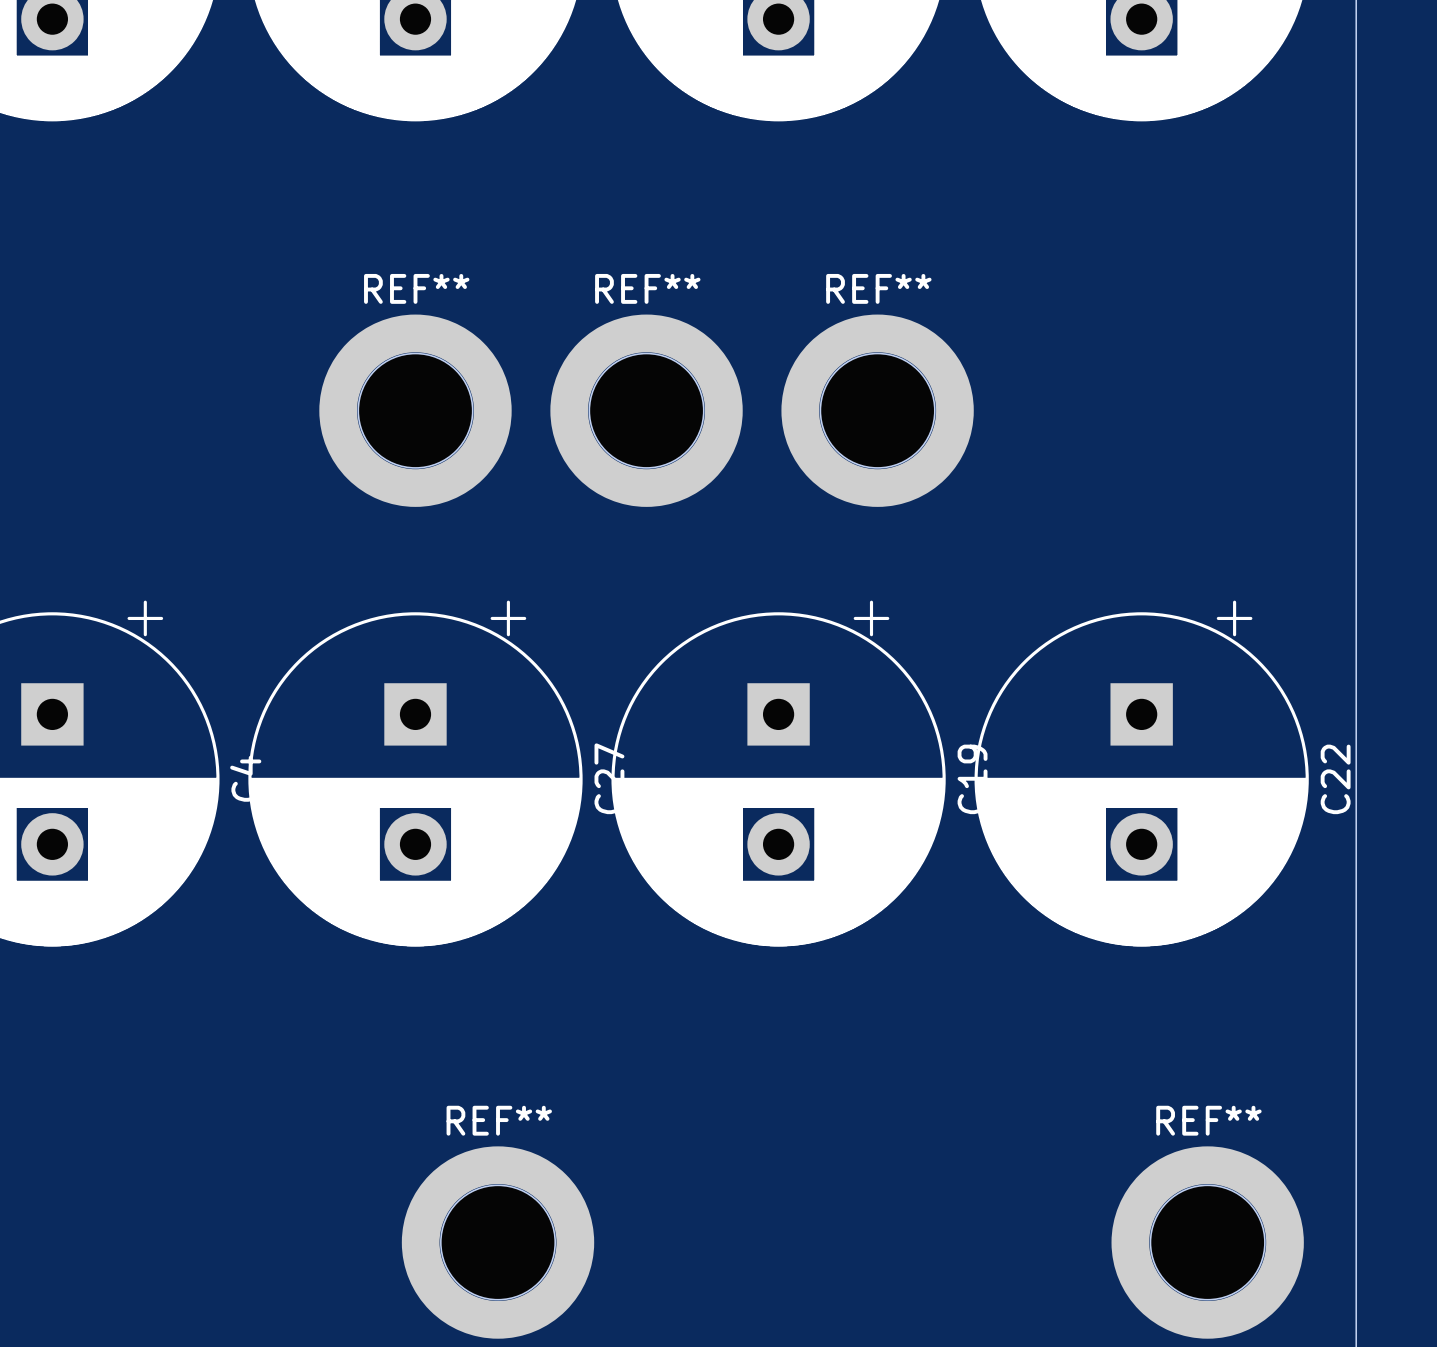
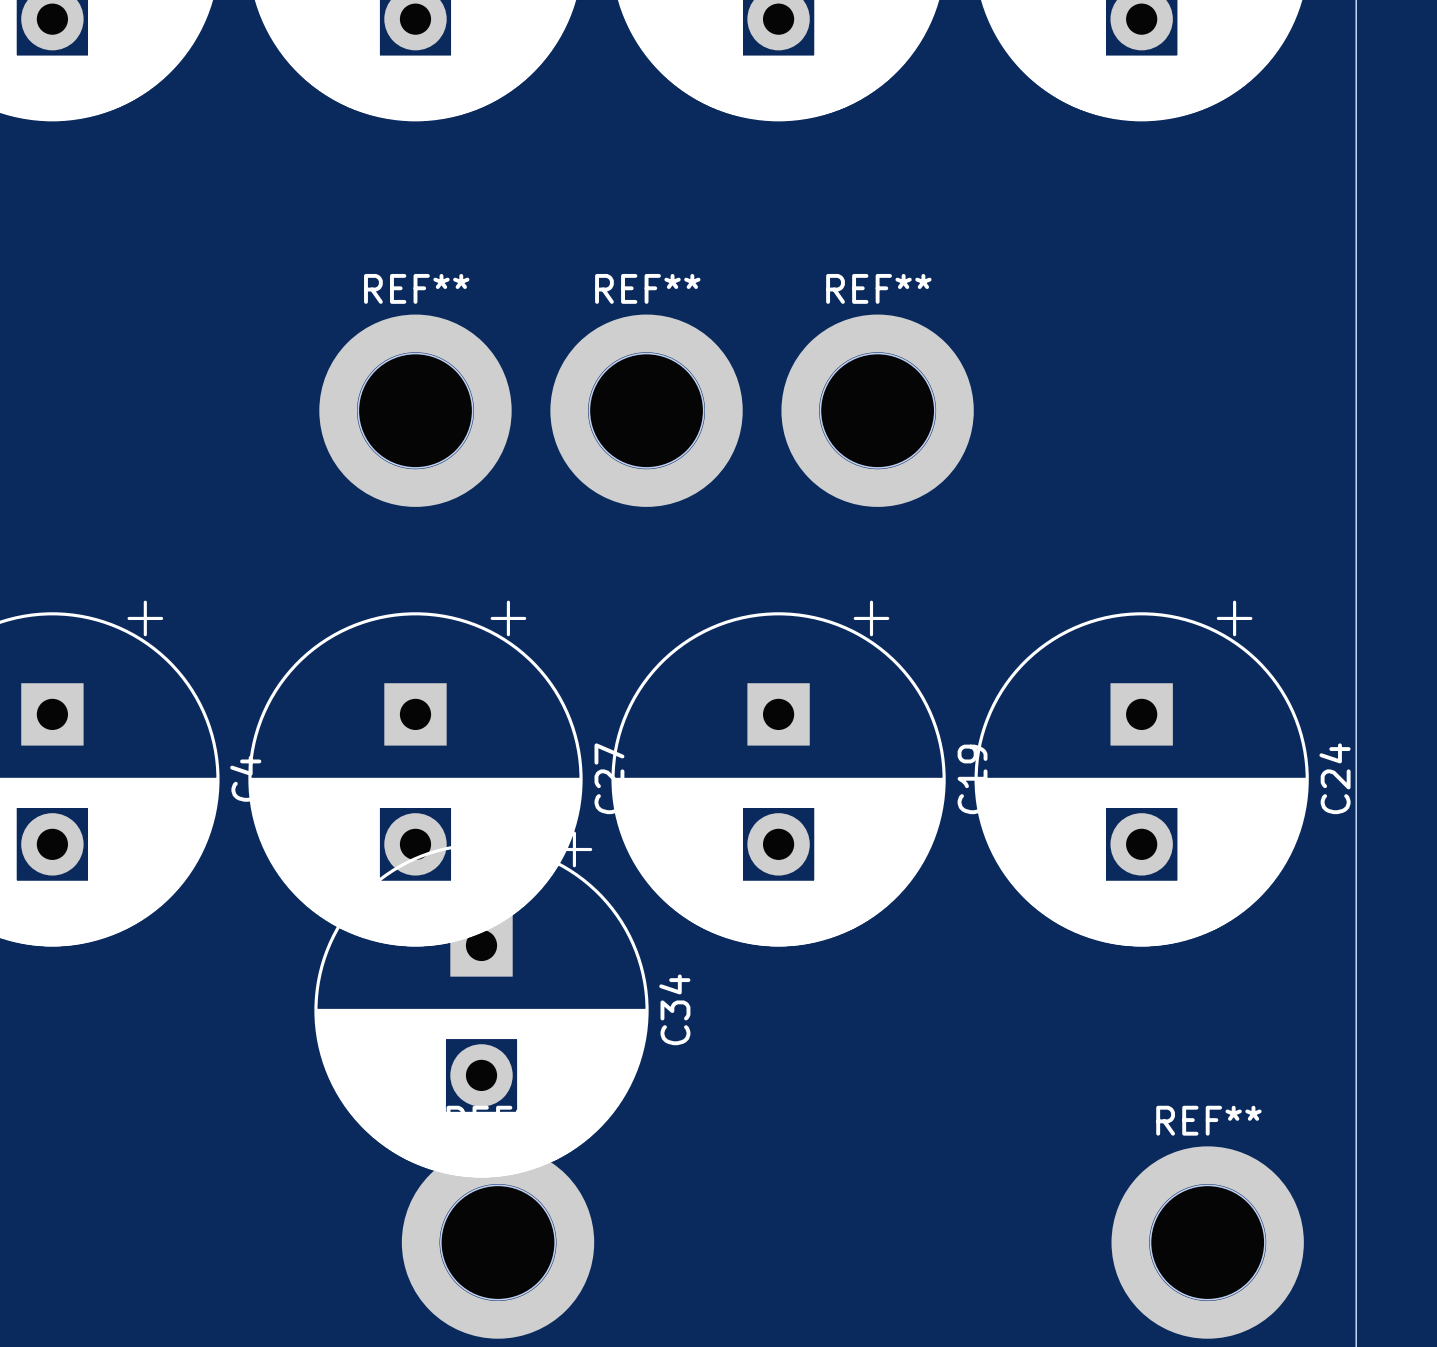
C22 name: C22 (1335, 779) -> C24 (1335, 778)
C34: none -> (481, 1004)

